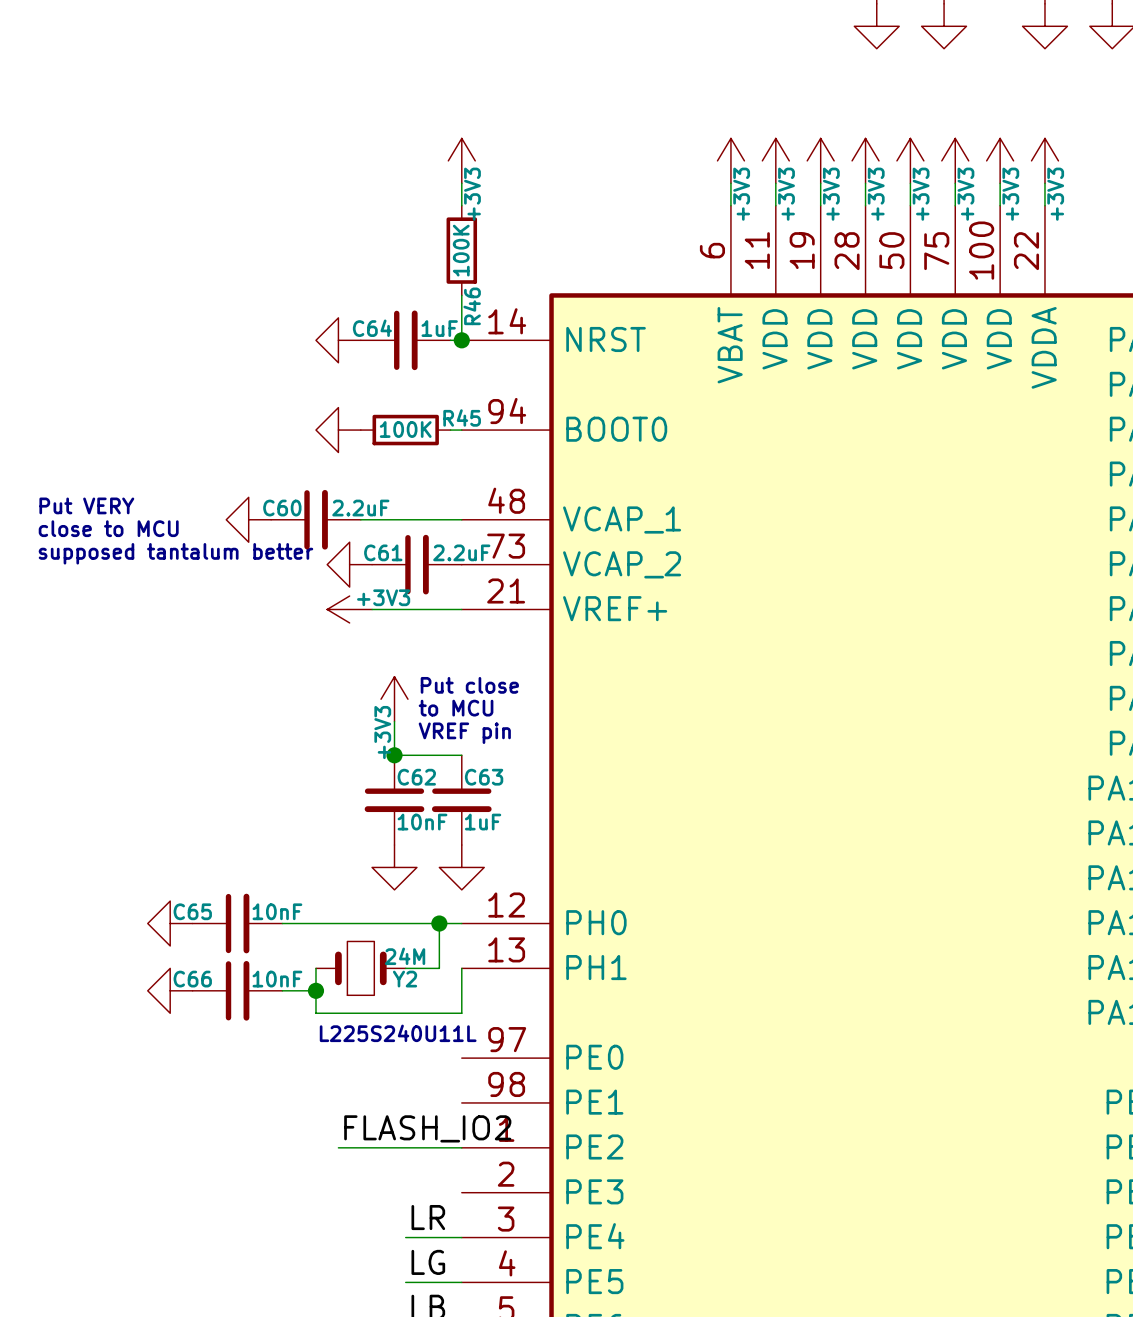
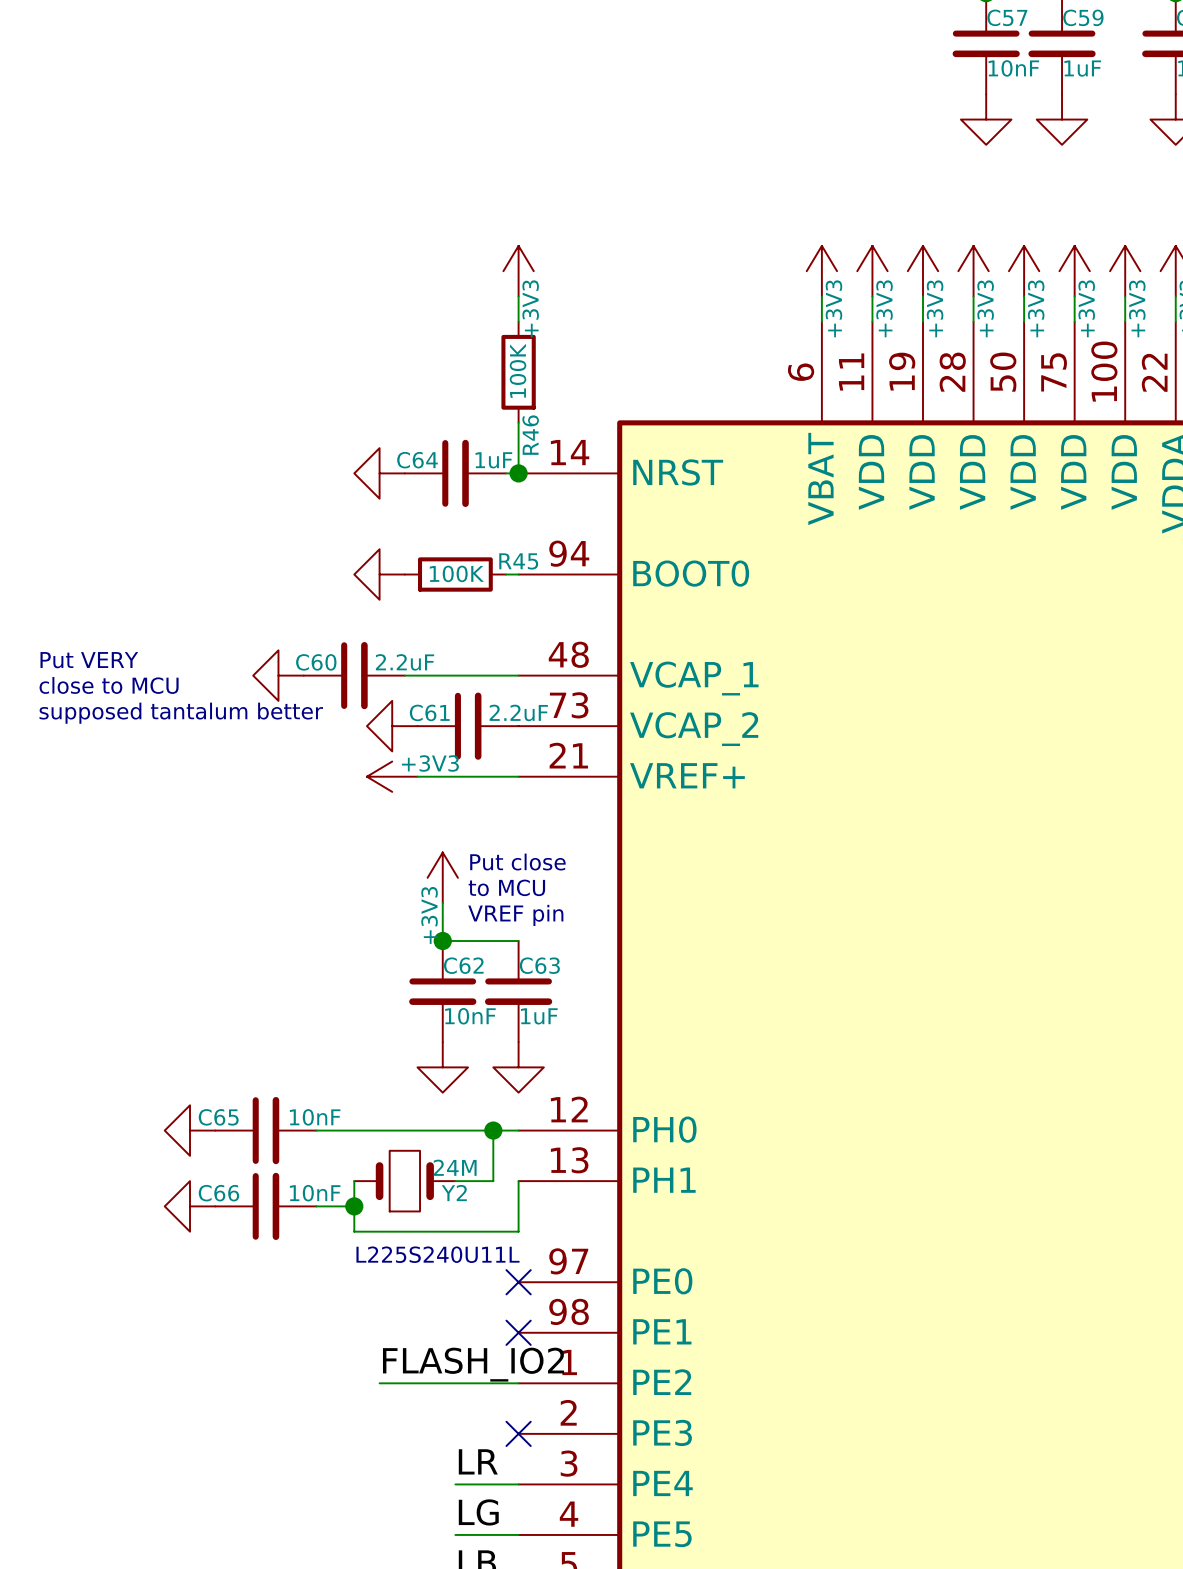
no-connect mark: none -> (518, 1282)
no-connect mark: none -> (518, 1332)
no-connect mark: none -> (518, 1433)

